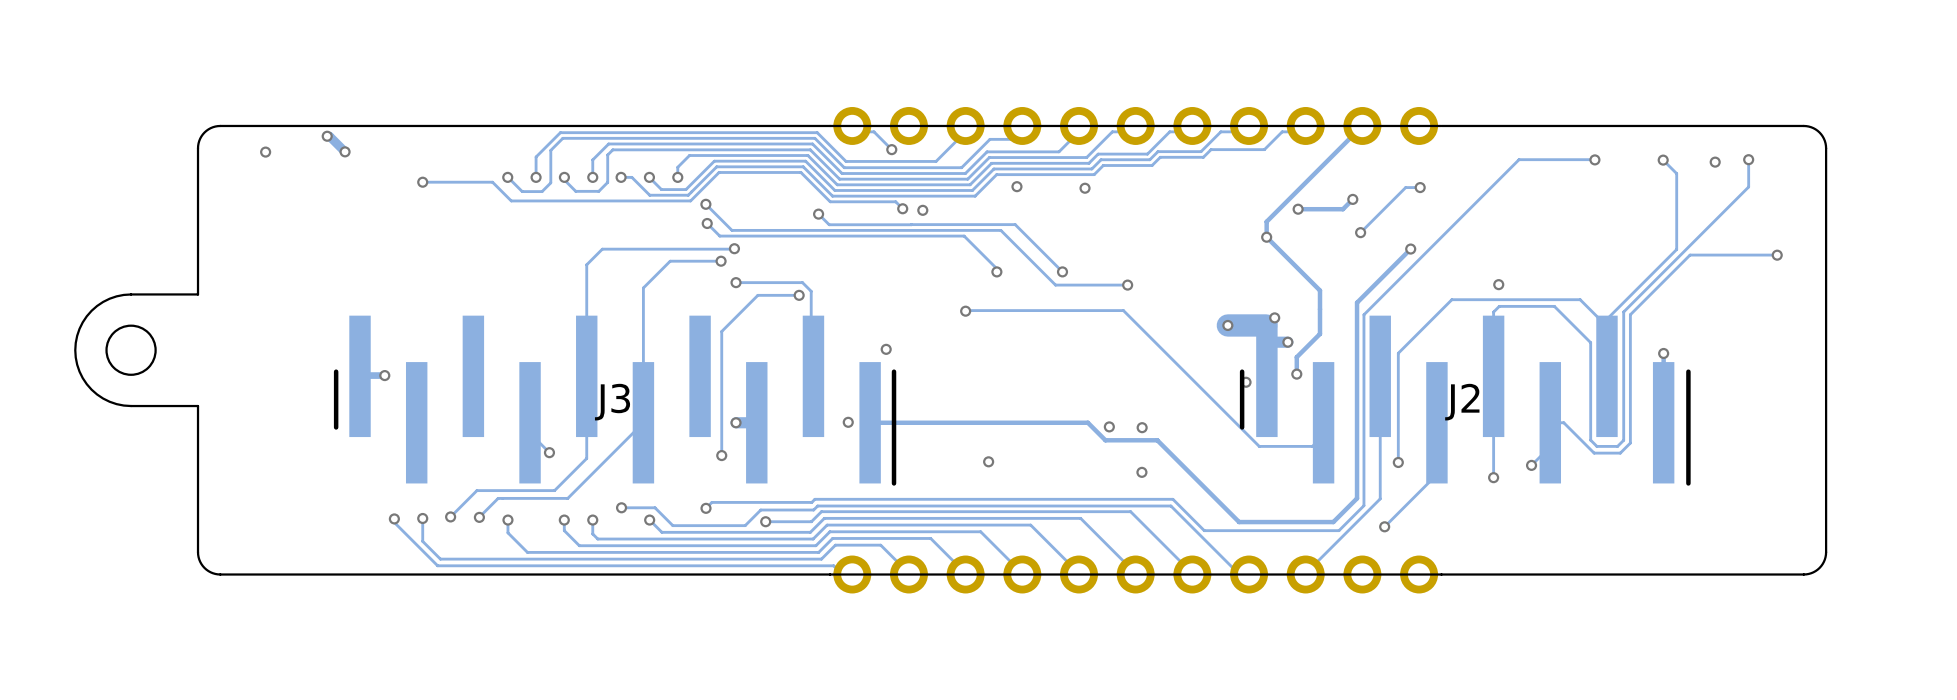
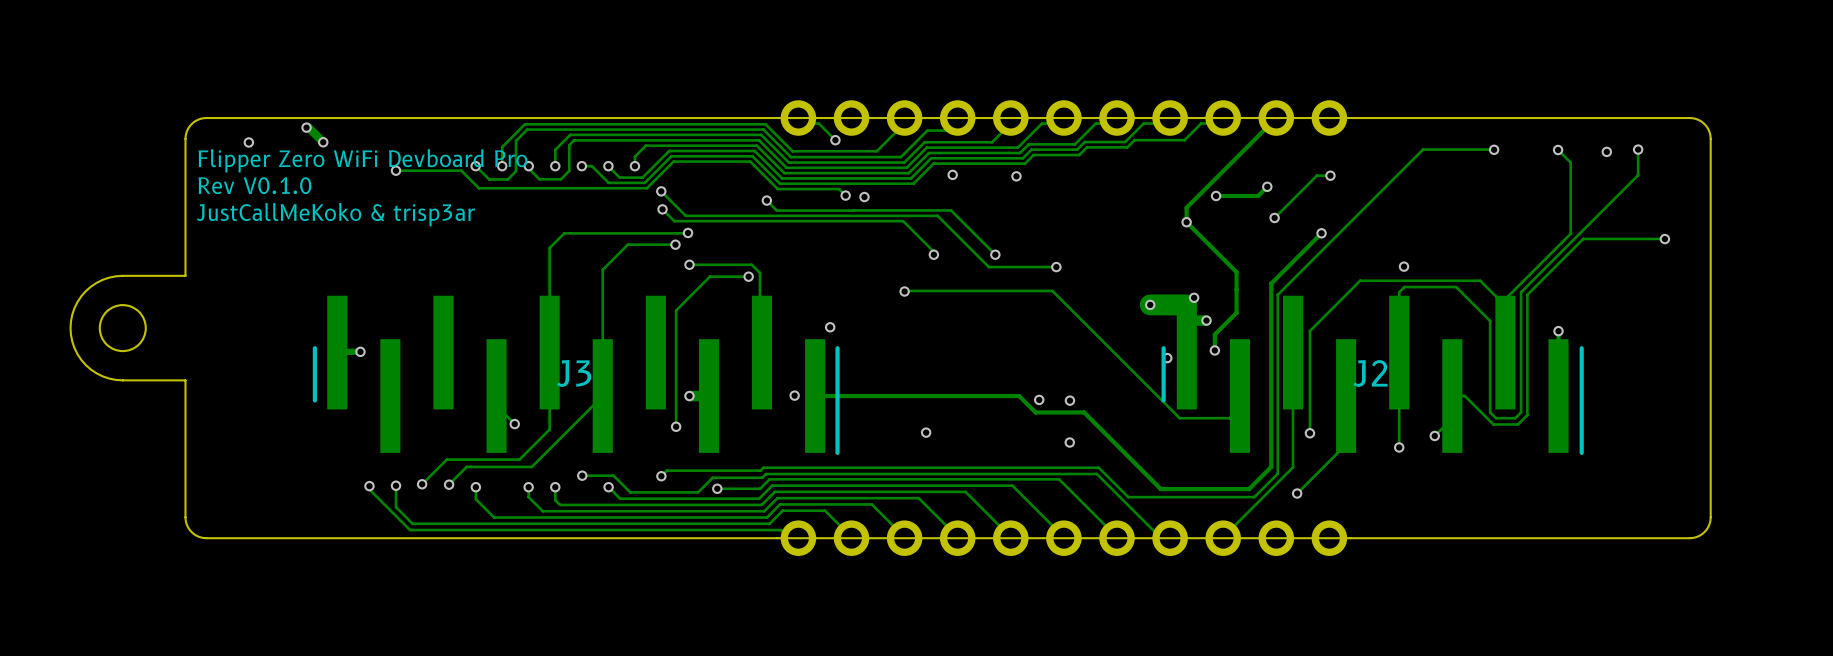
text: none -> Flipper Zero WiFi Devboard Pro (362, 160)
text: none -> Rev V0.1.0 (254, 185)
text: none -> JustCallMeKoko & trisp3ar (335, 214)

